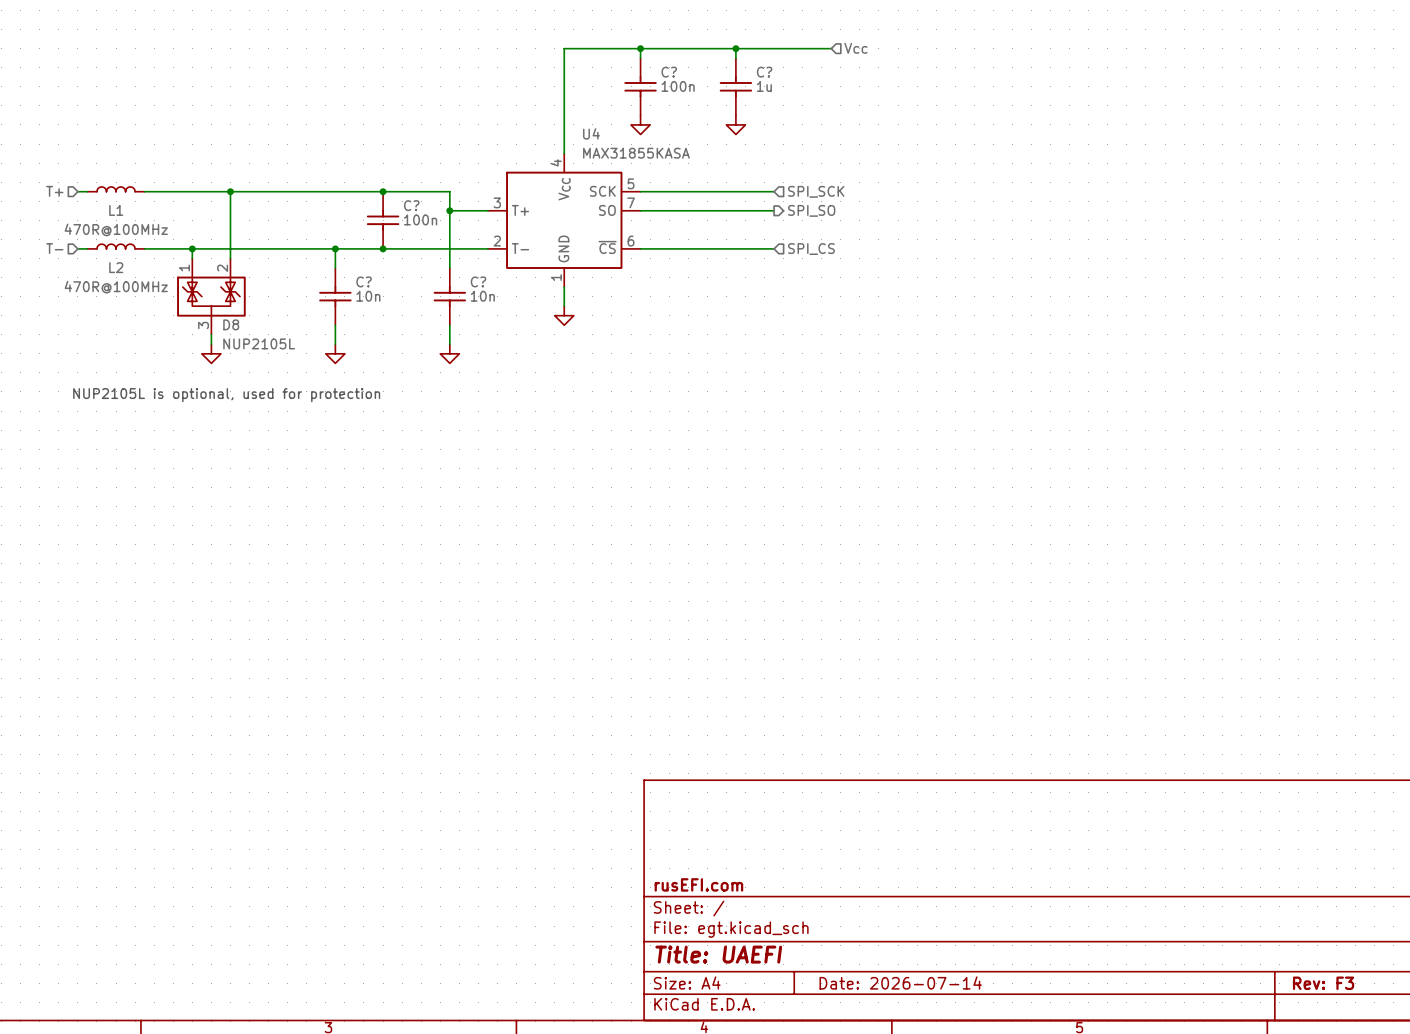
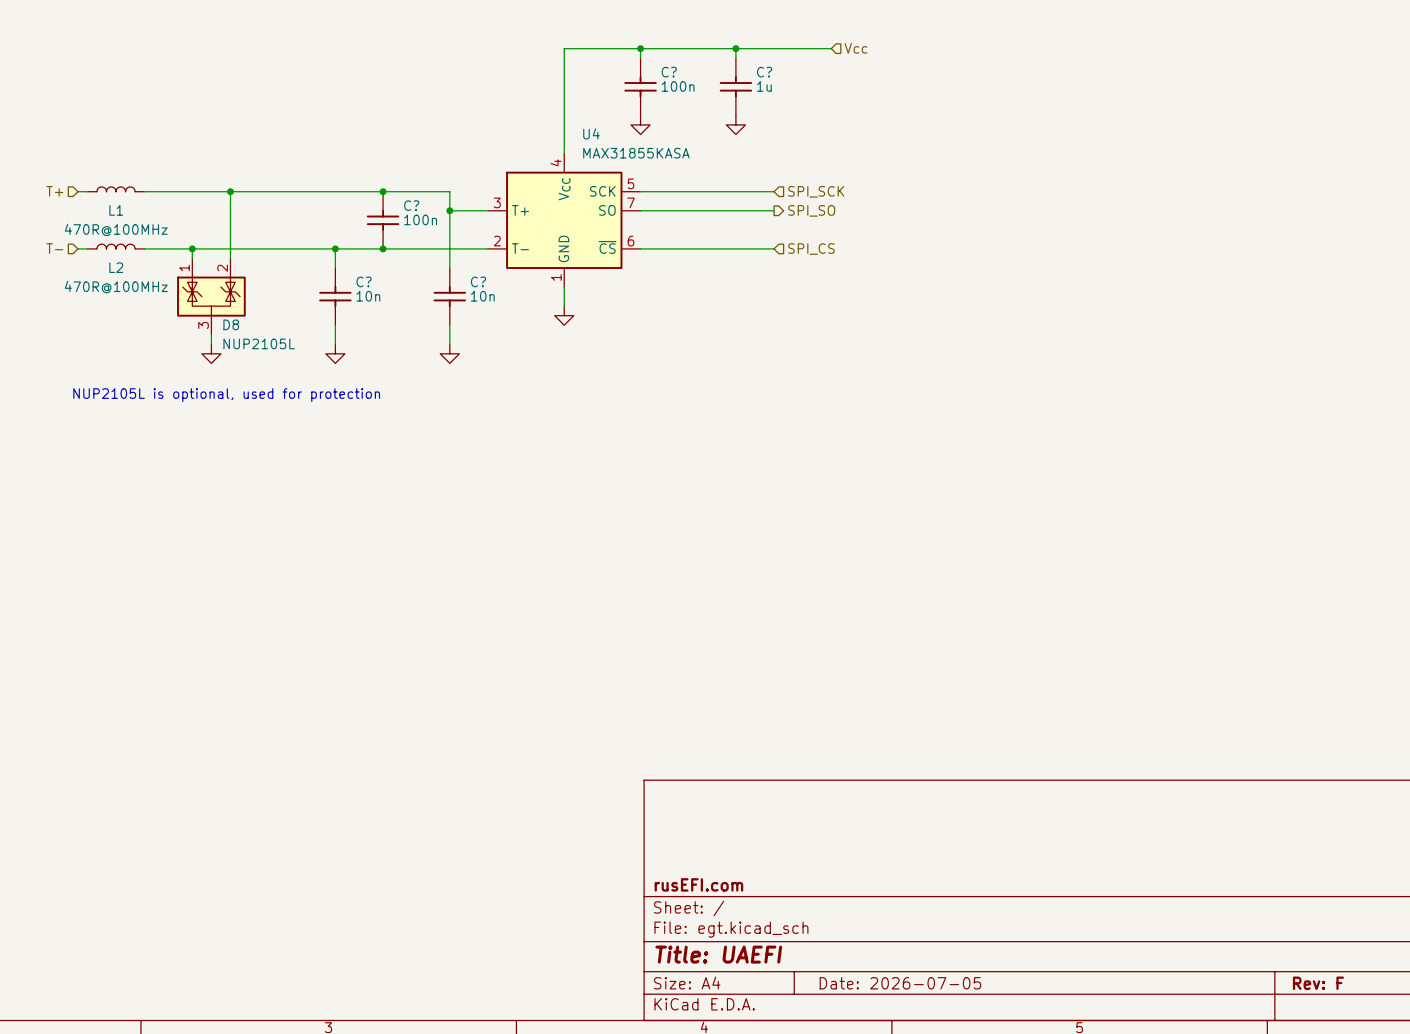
title block: Date: 2026-07-14 (900, 983) -> Date: 2026-07-05 (900, 983)
title block: Rev: F3 (1323, 983) -> Rev: F (1318, 983)

